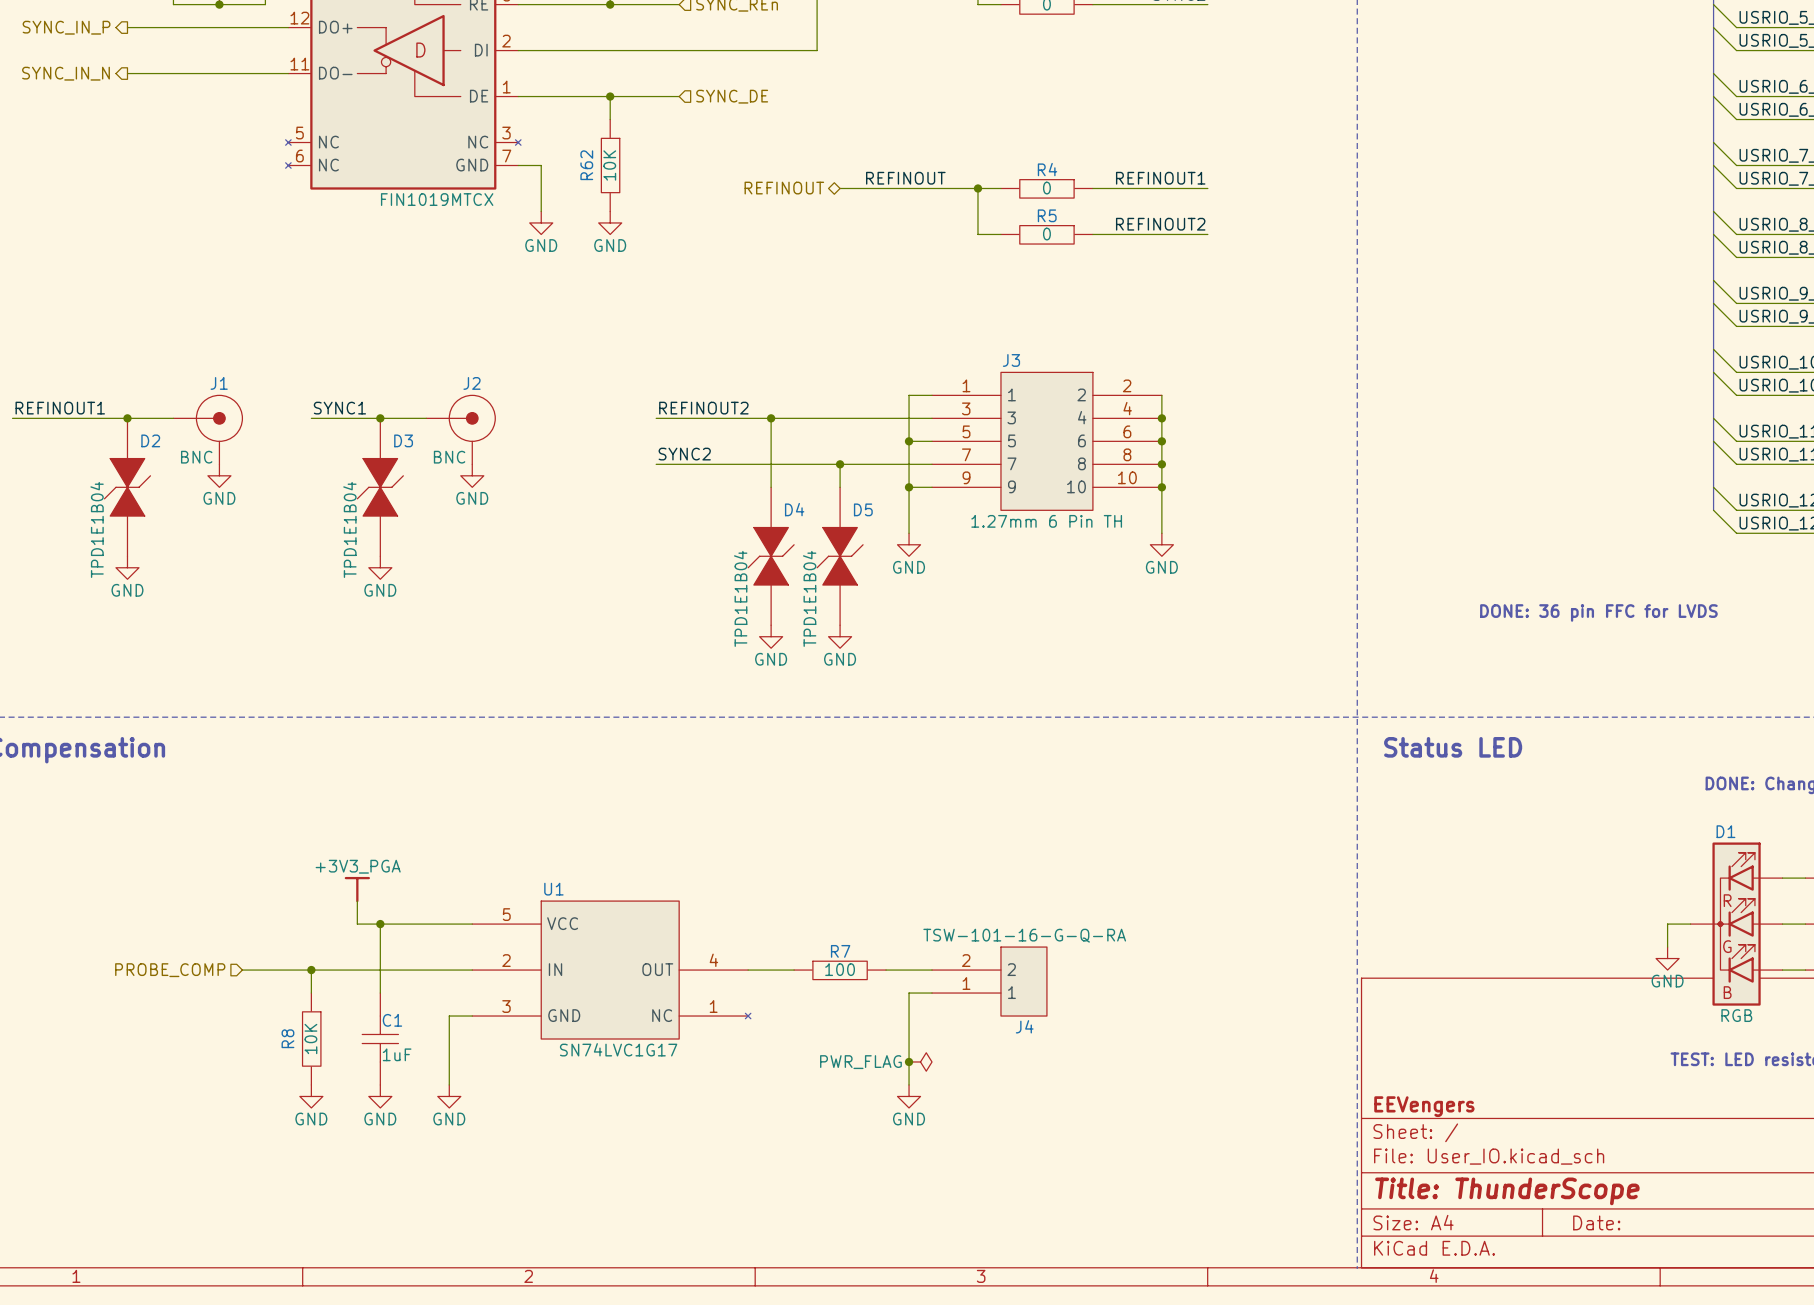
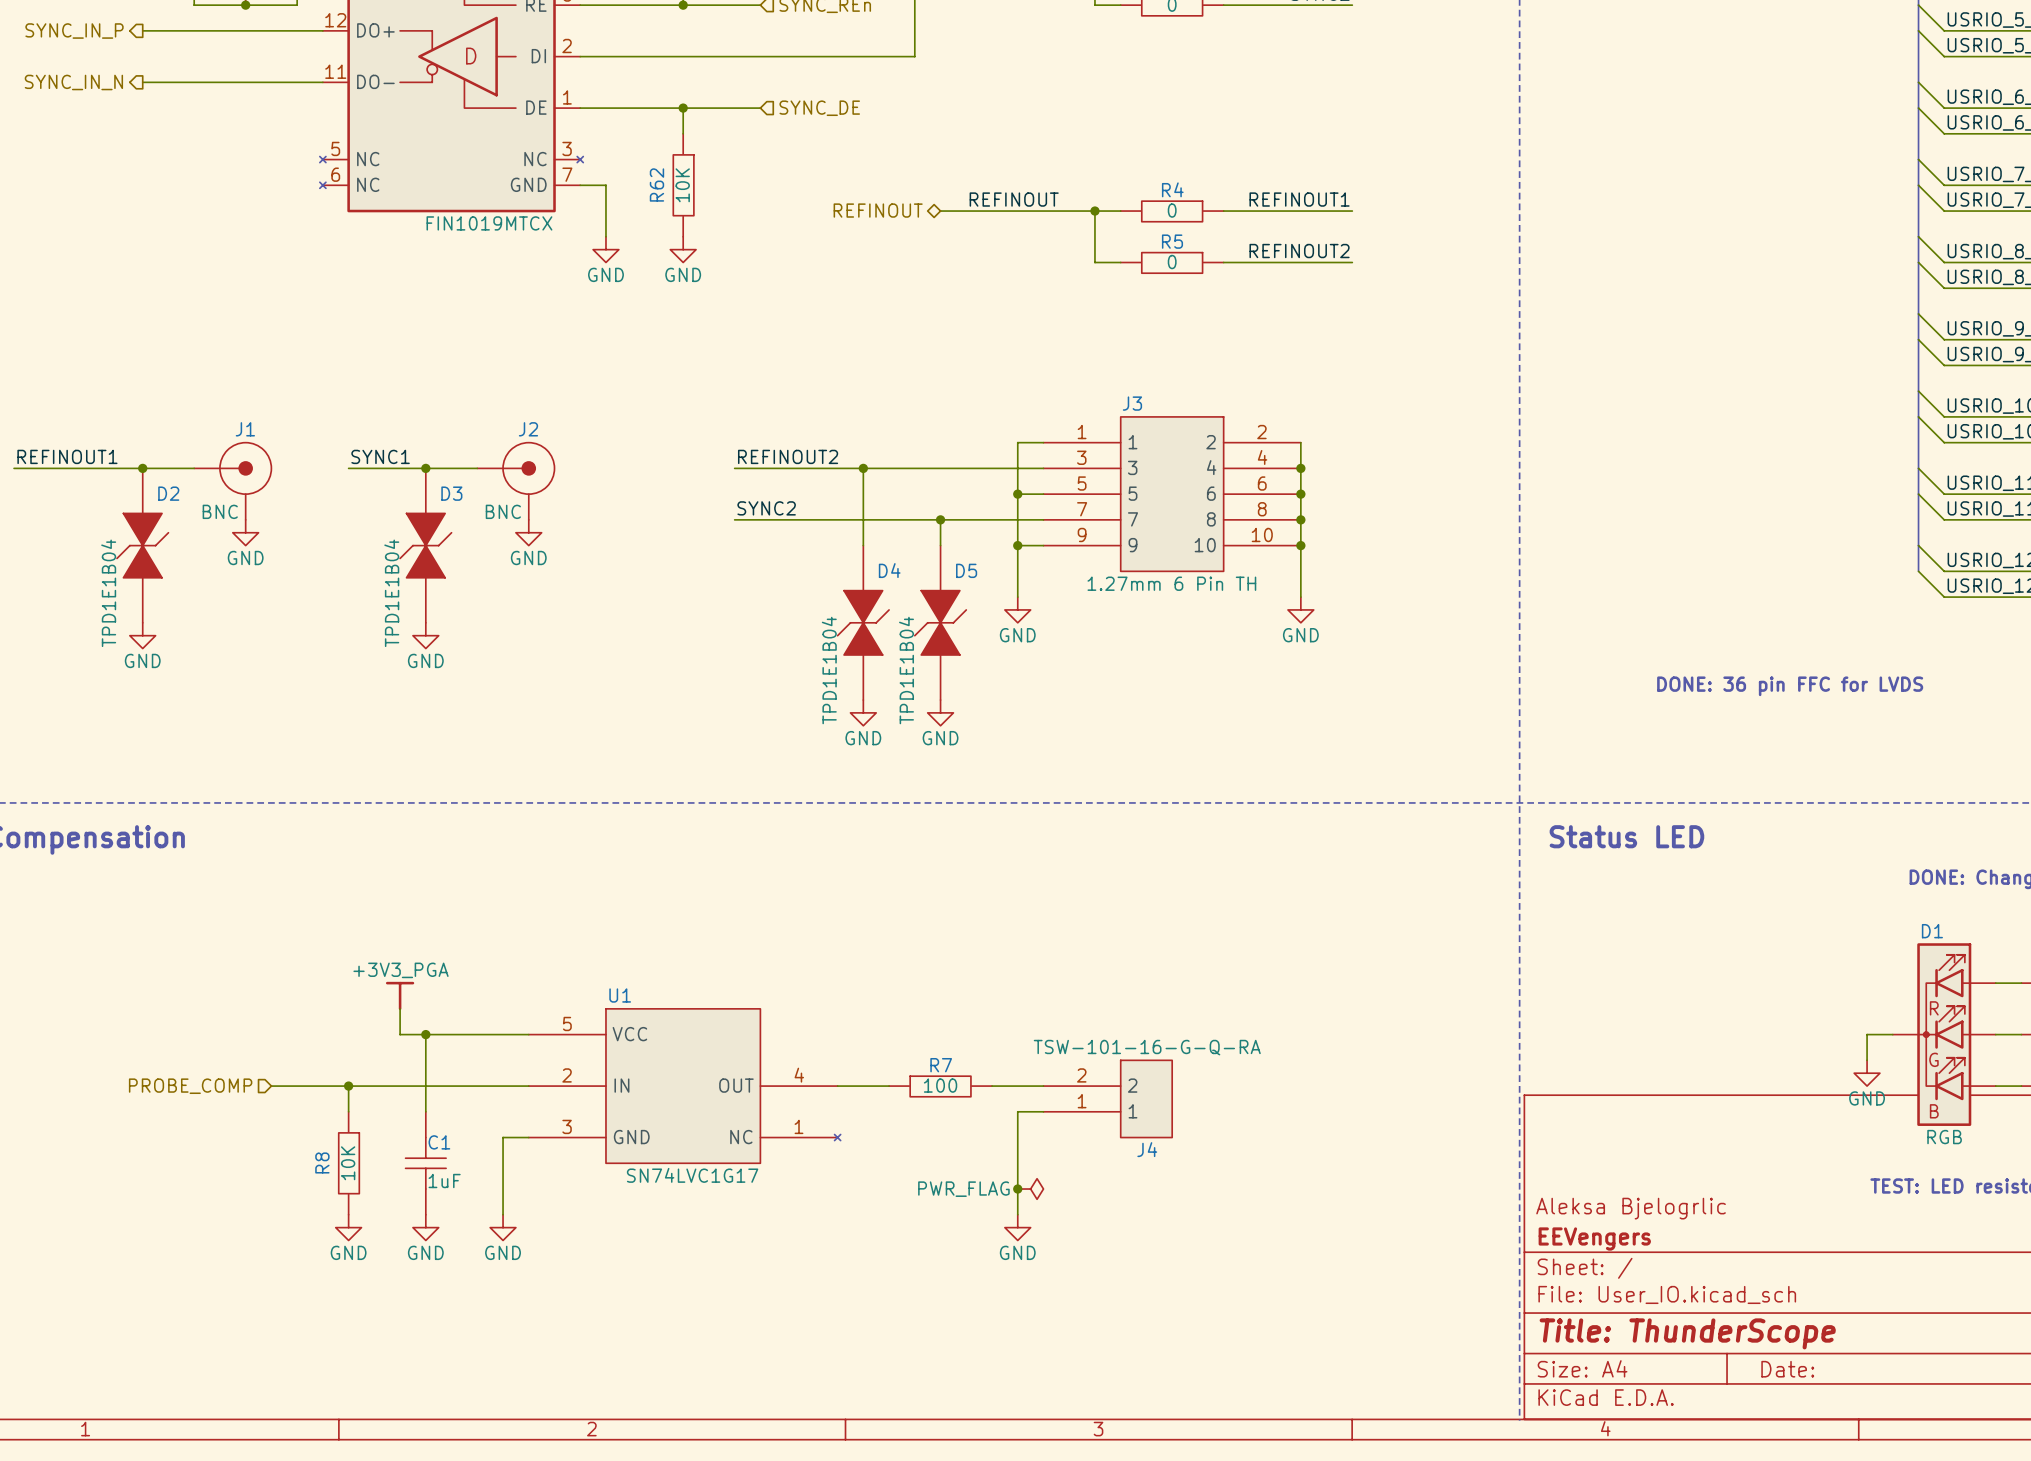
title block: none -> Aleksa Bjelogrlic (1631, 1208)

